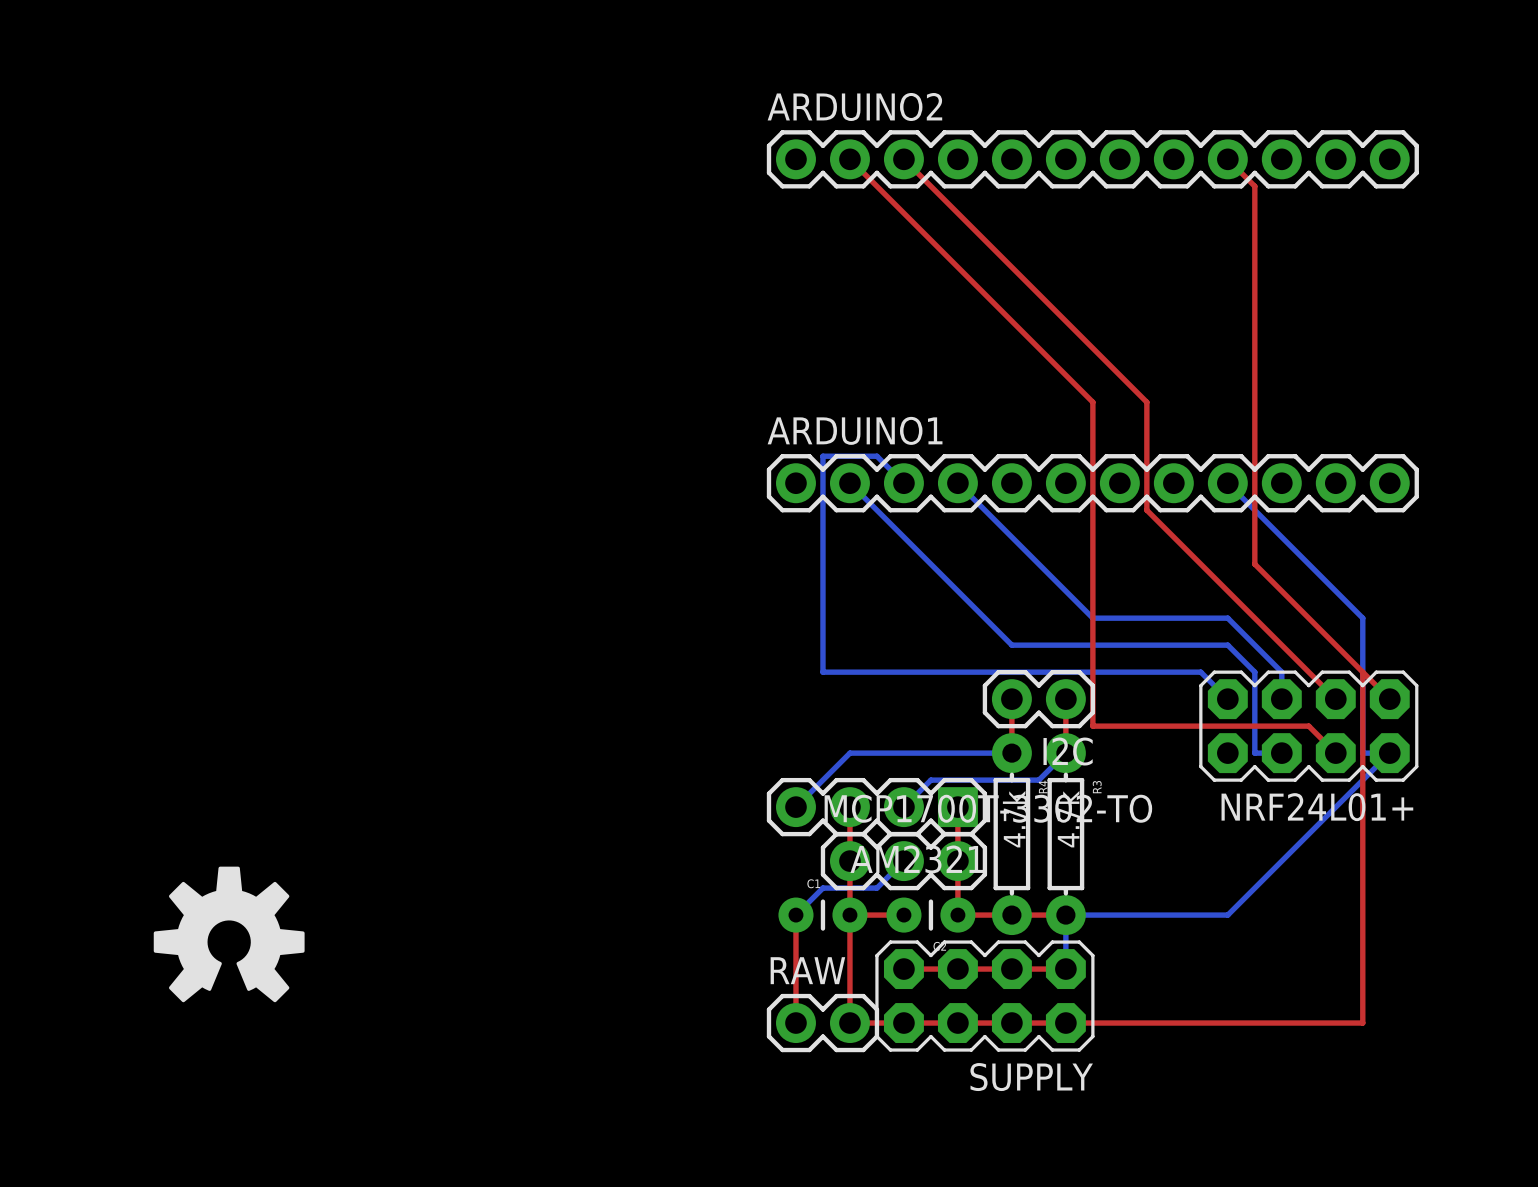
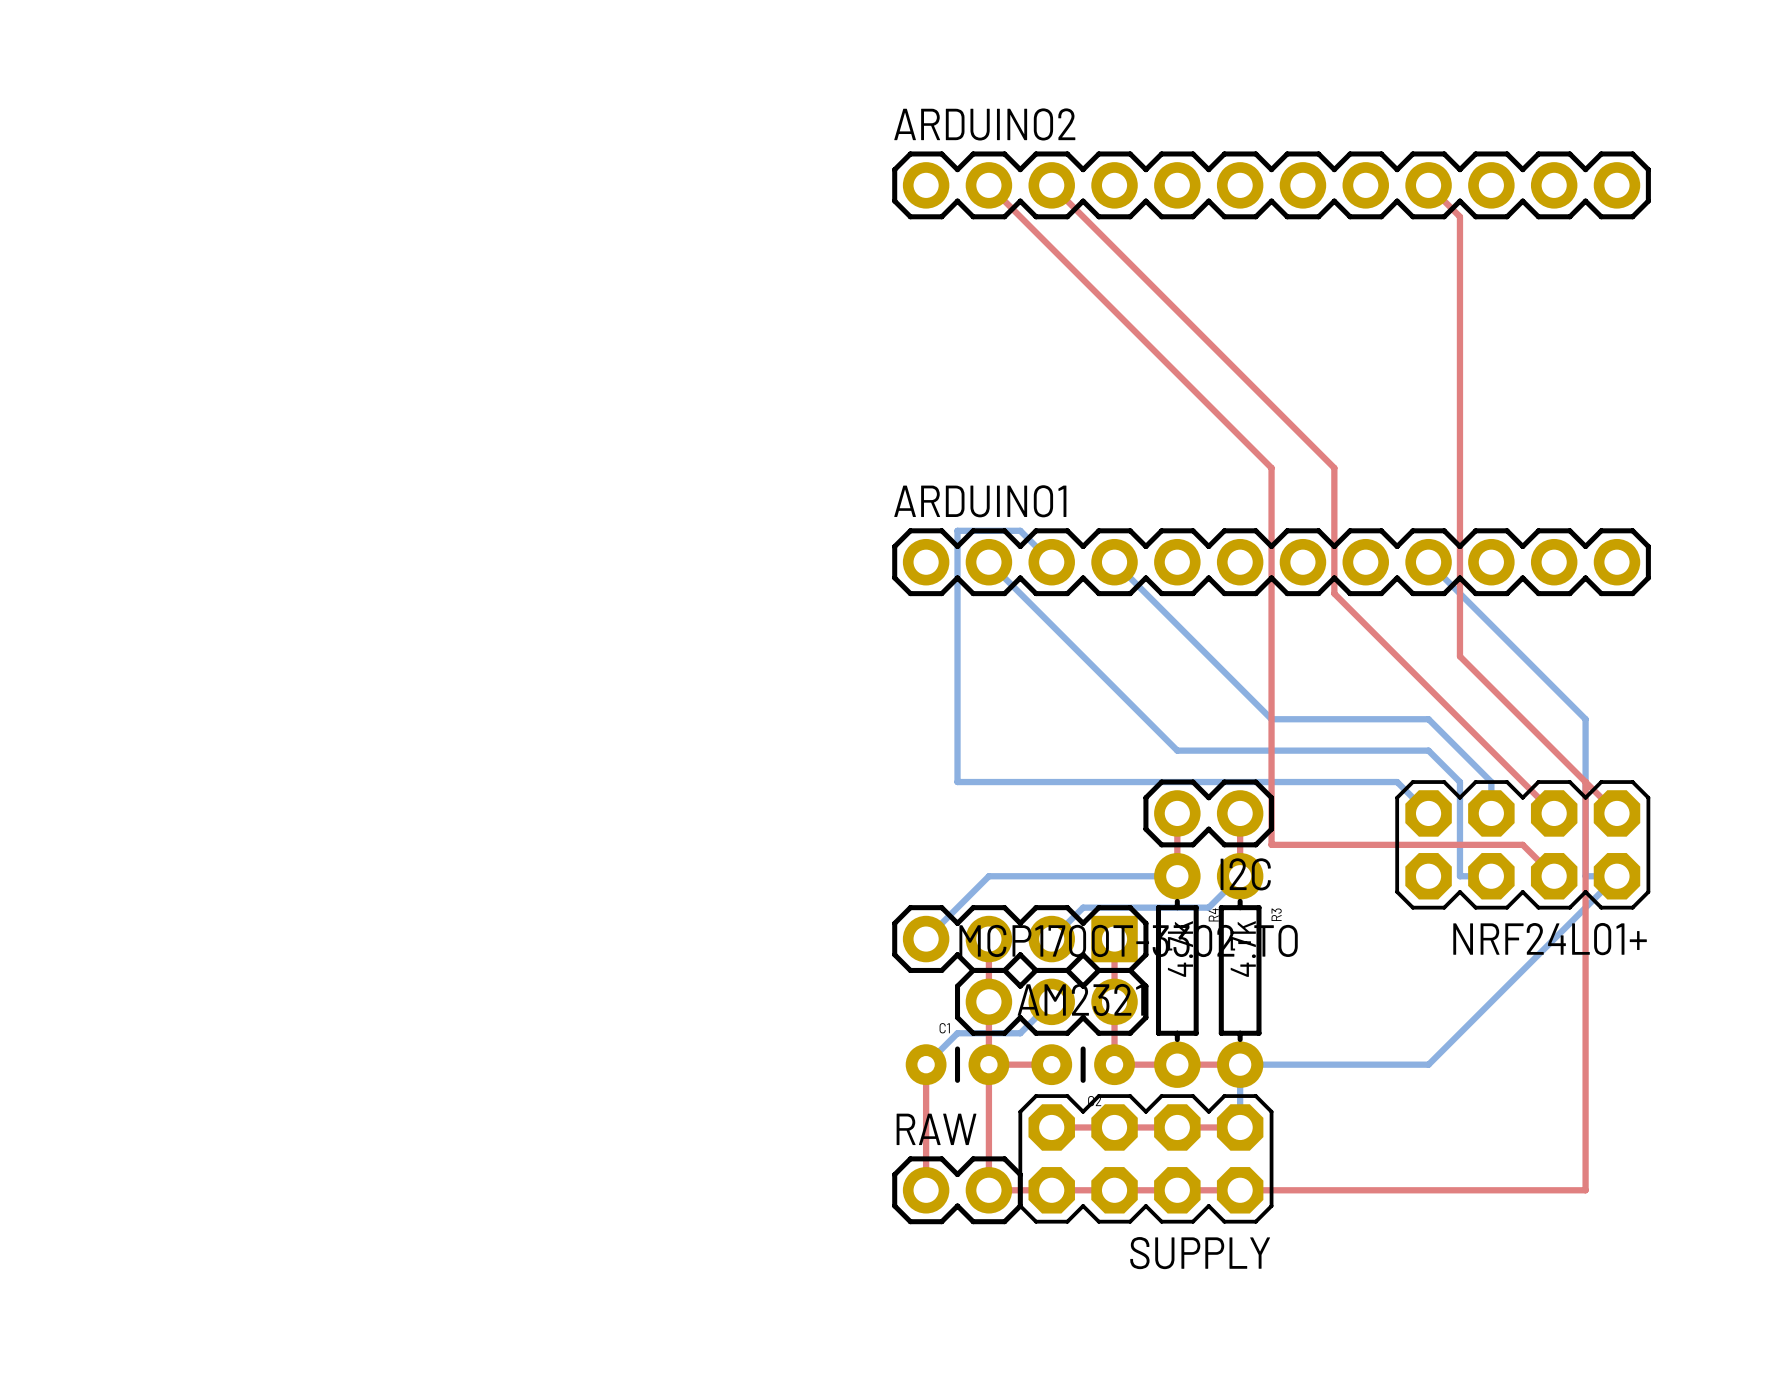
drawing: [153, 866, 305, 1003] -> none

